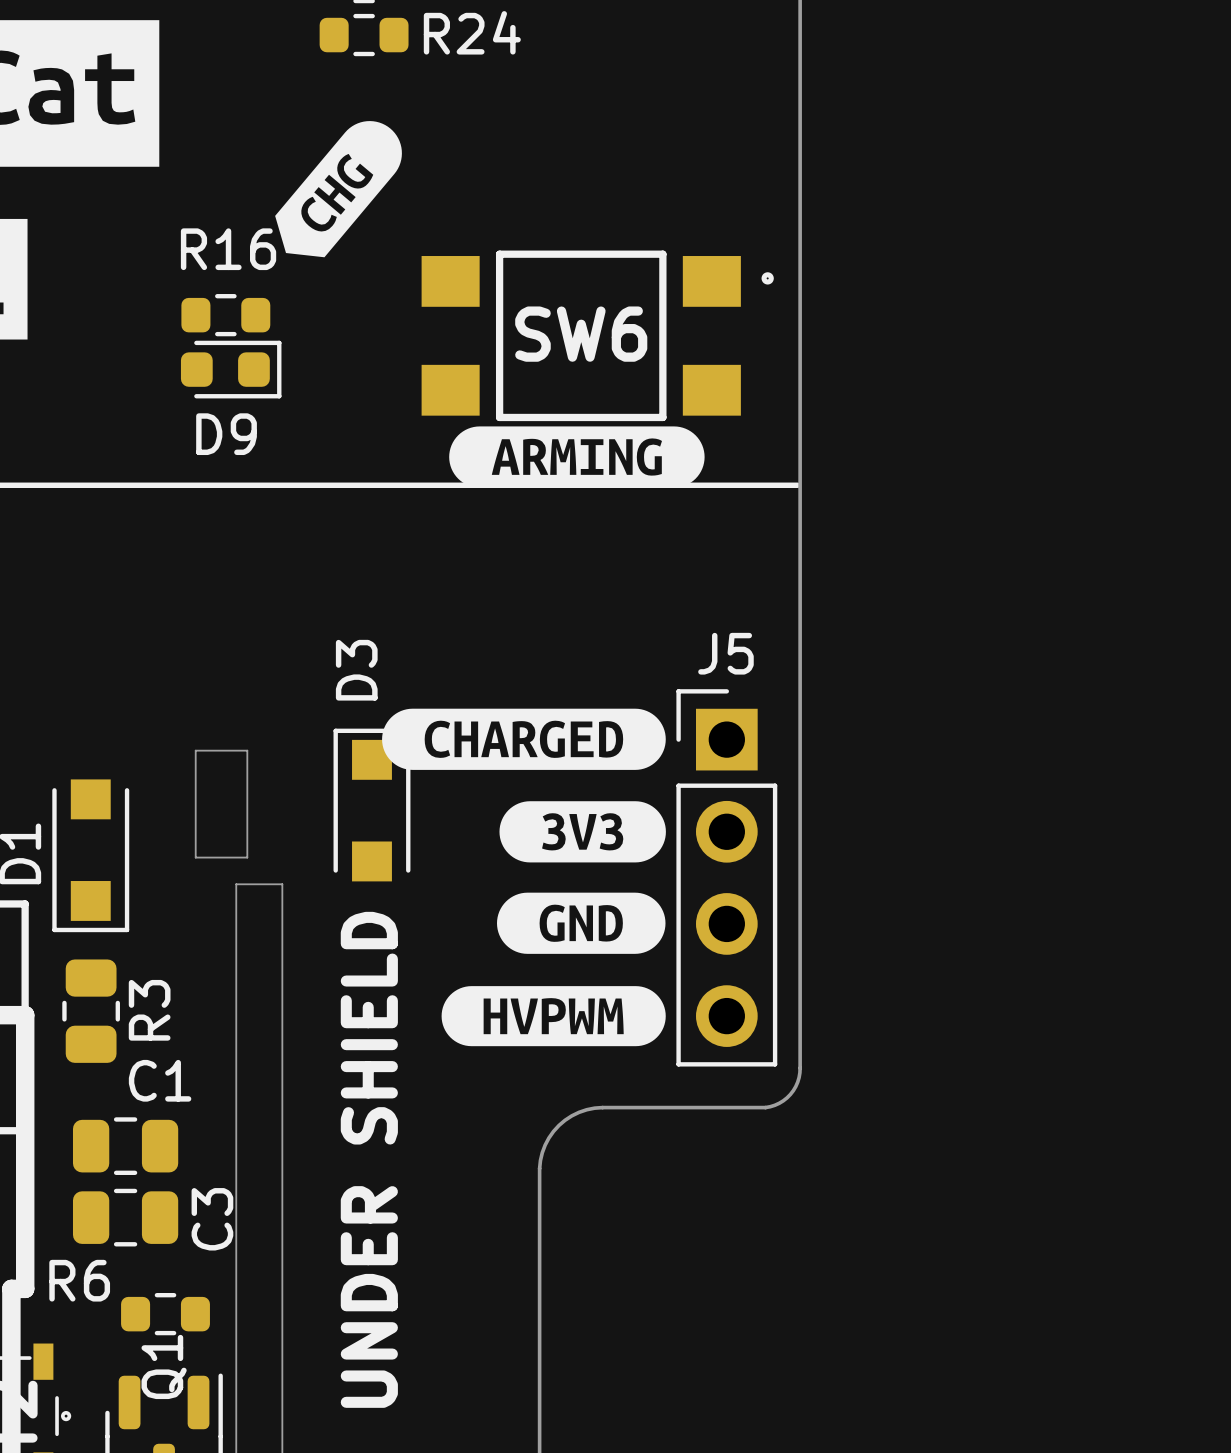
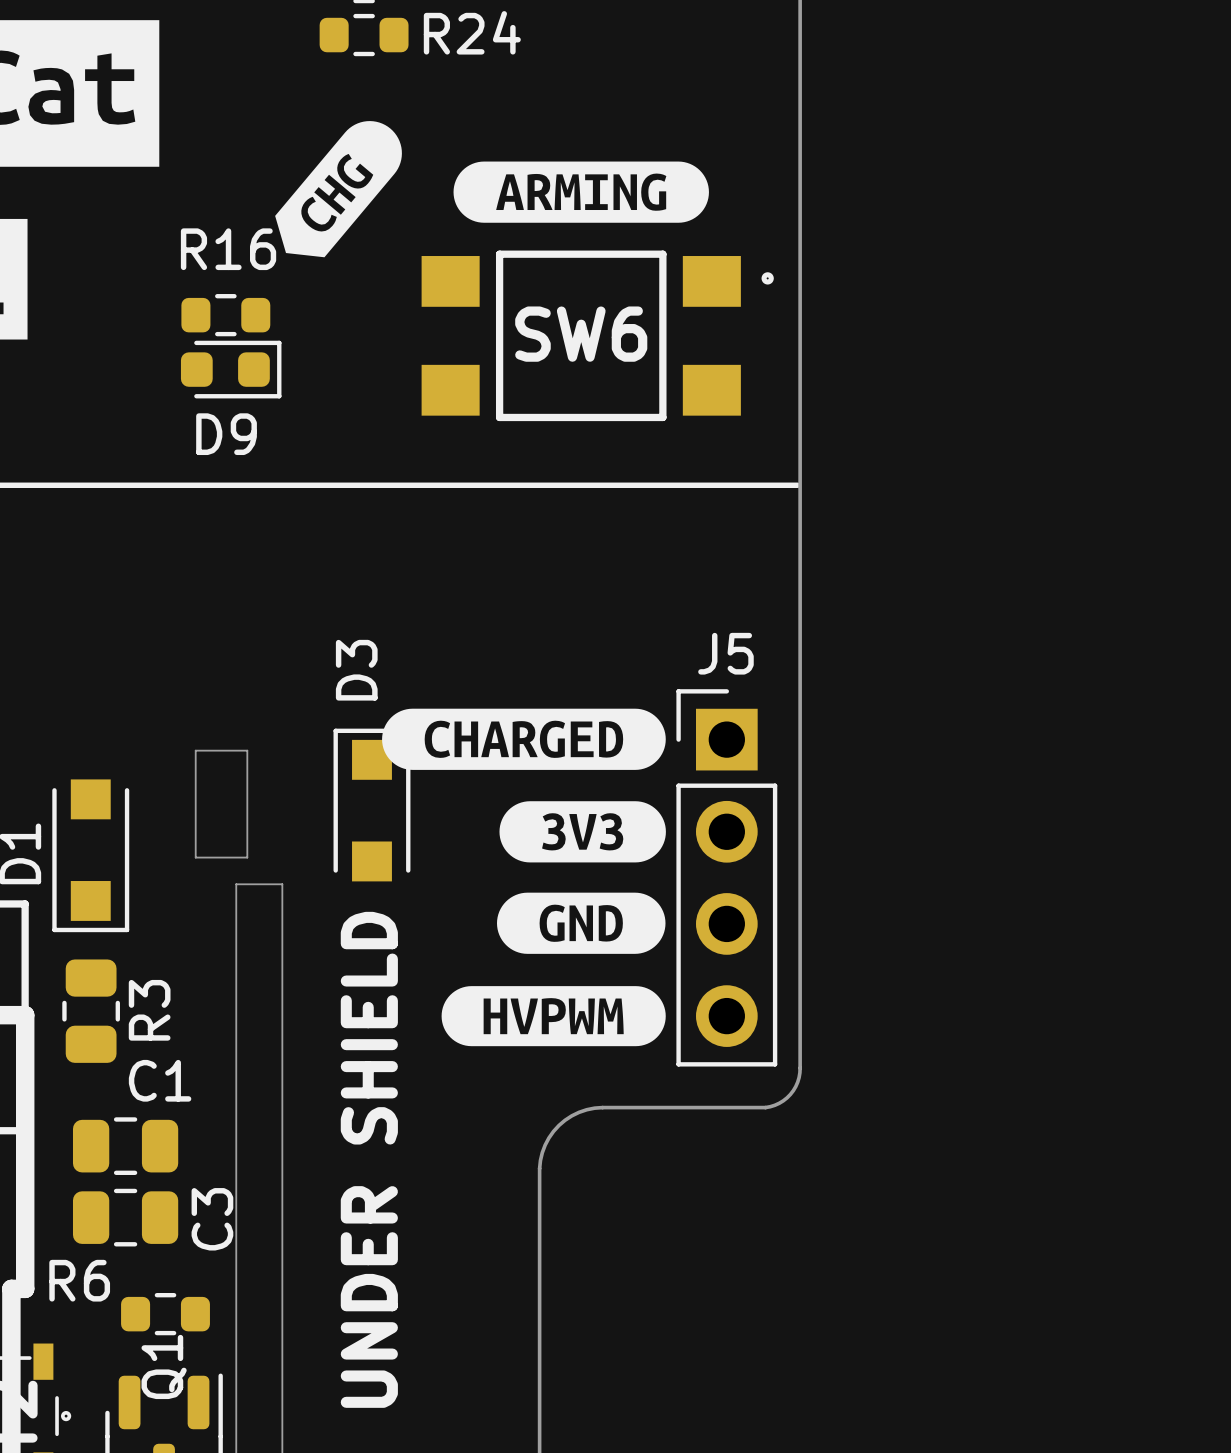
drawing position: (576, 457) -> (581, 192)

